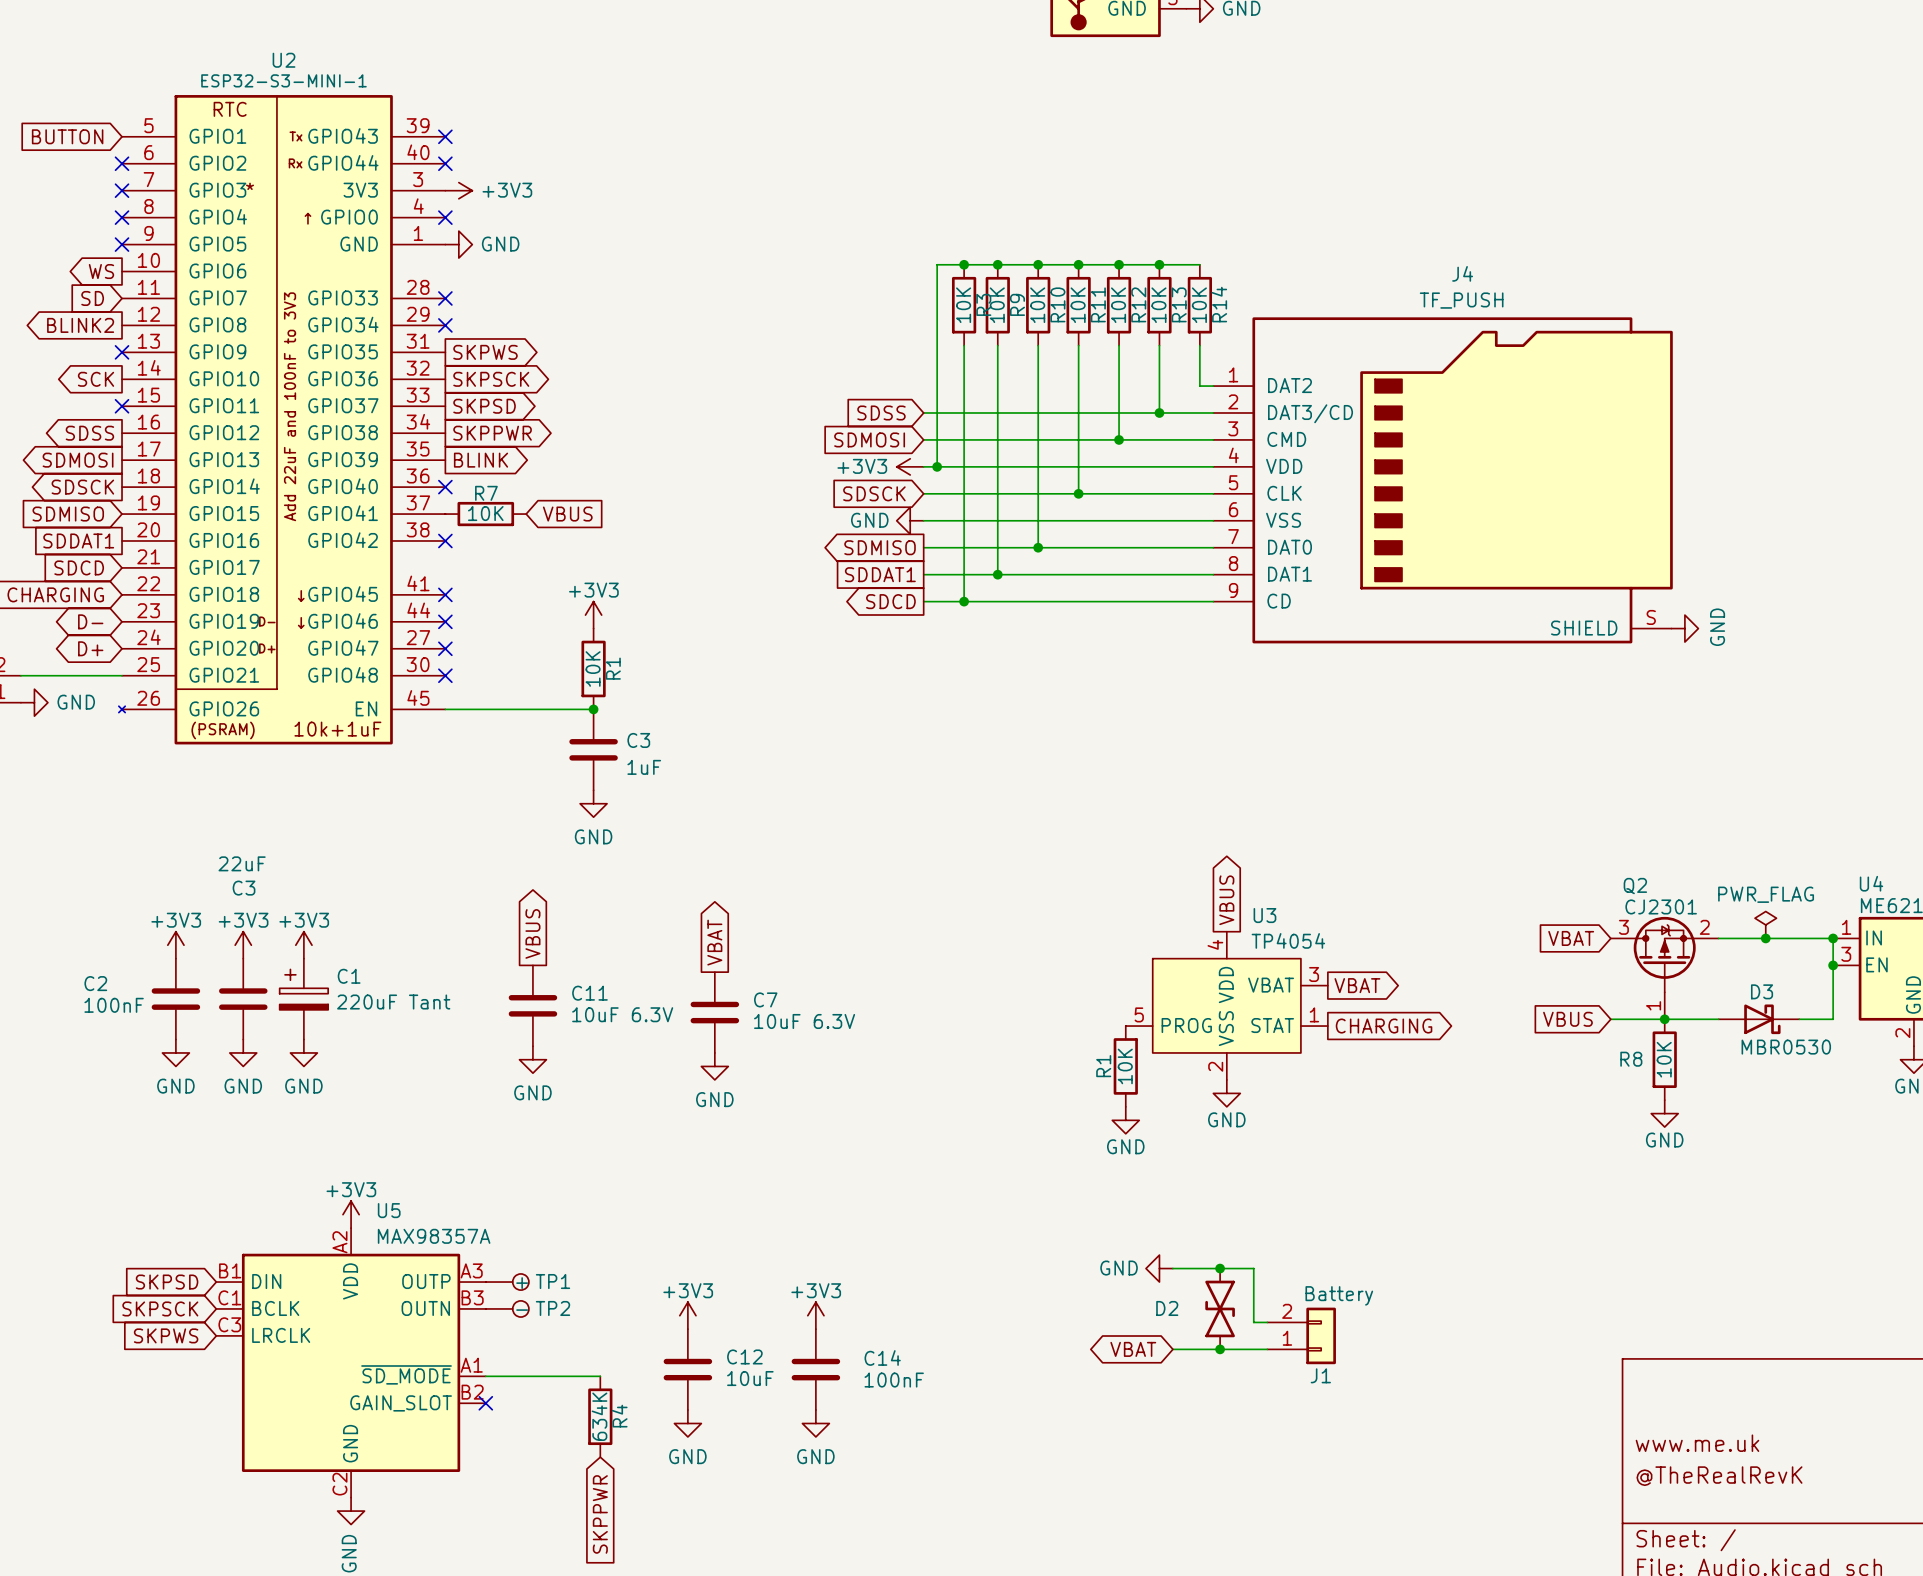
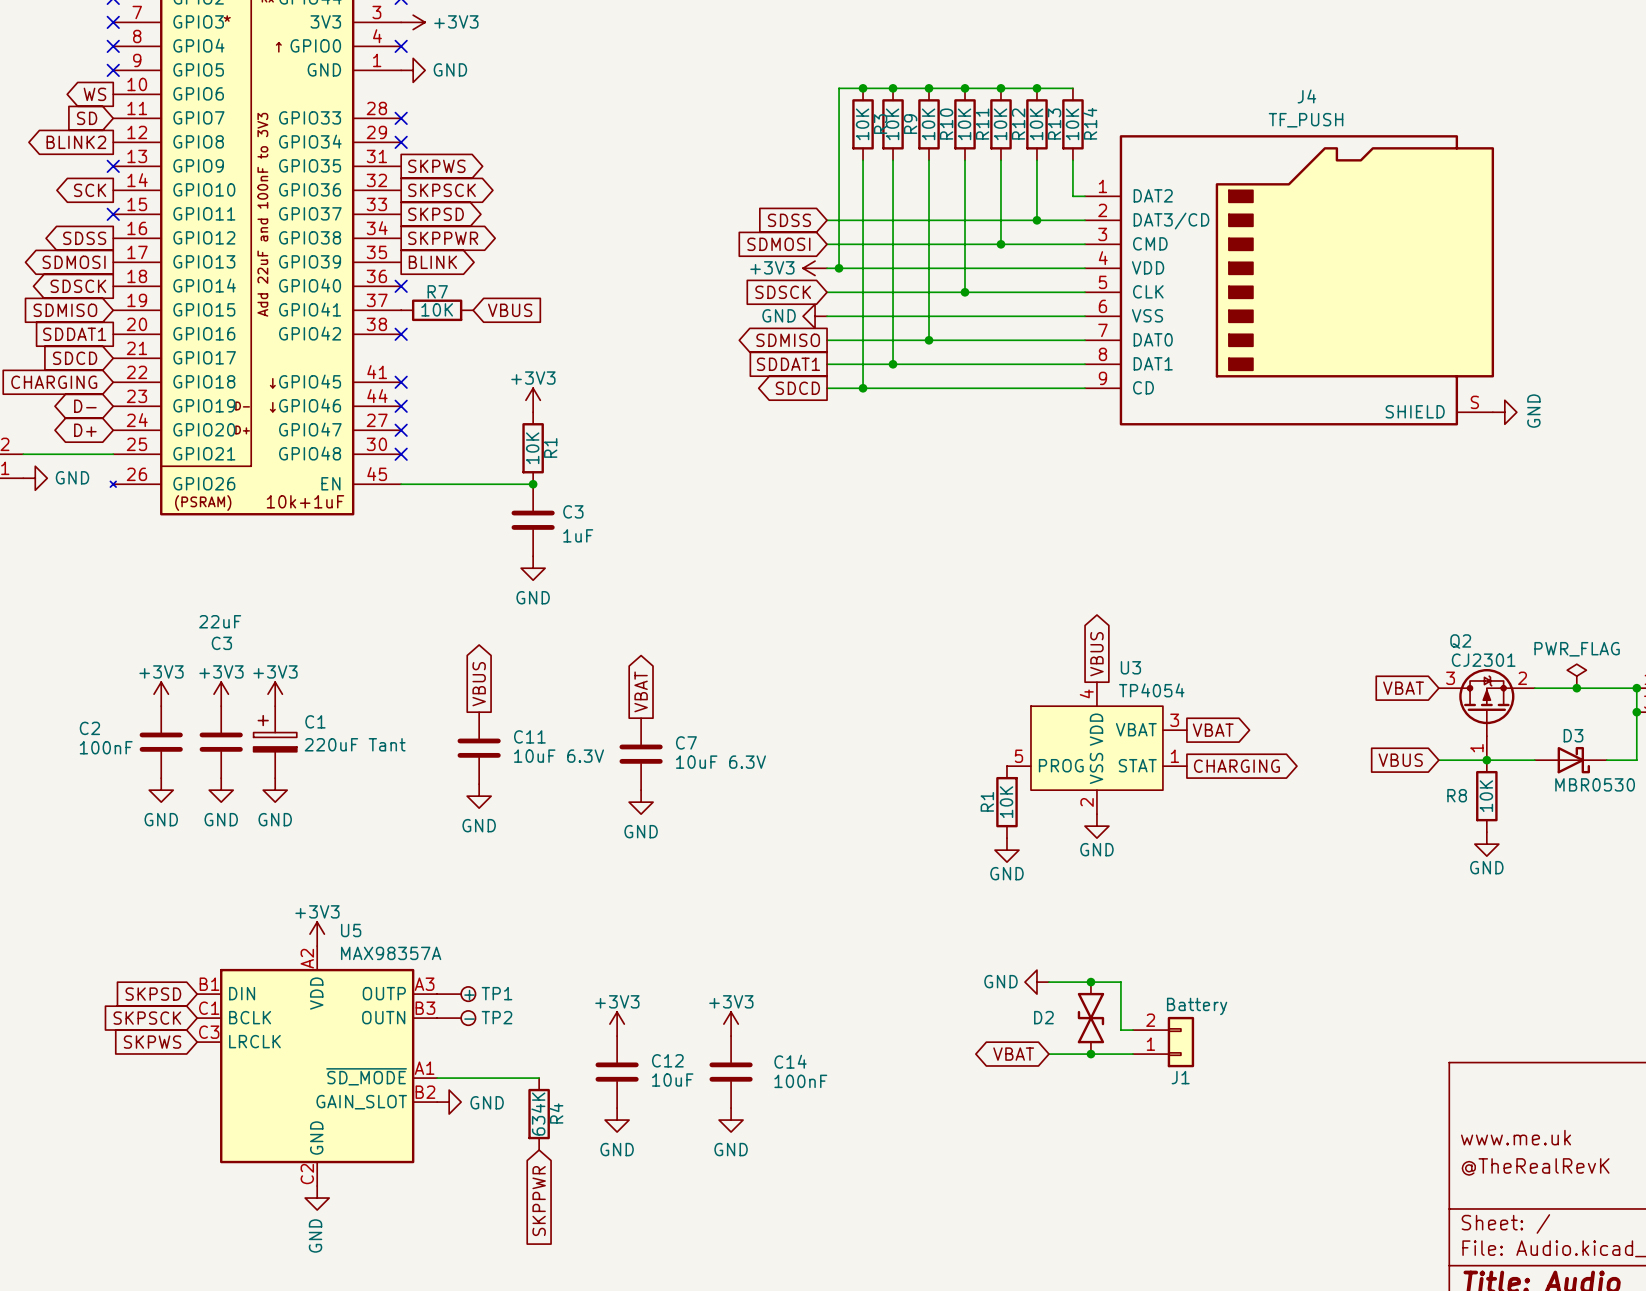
no-connect mark: (485, 1403) -> none
power symbol: none -> GND (449, 1102)

